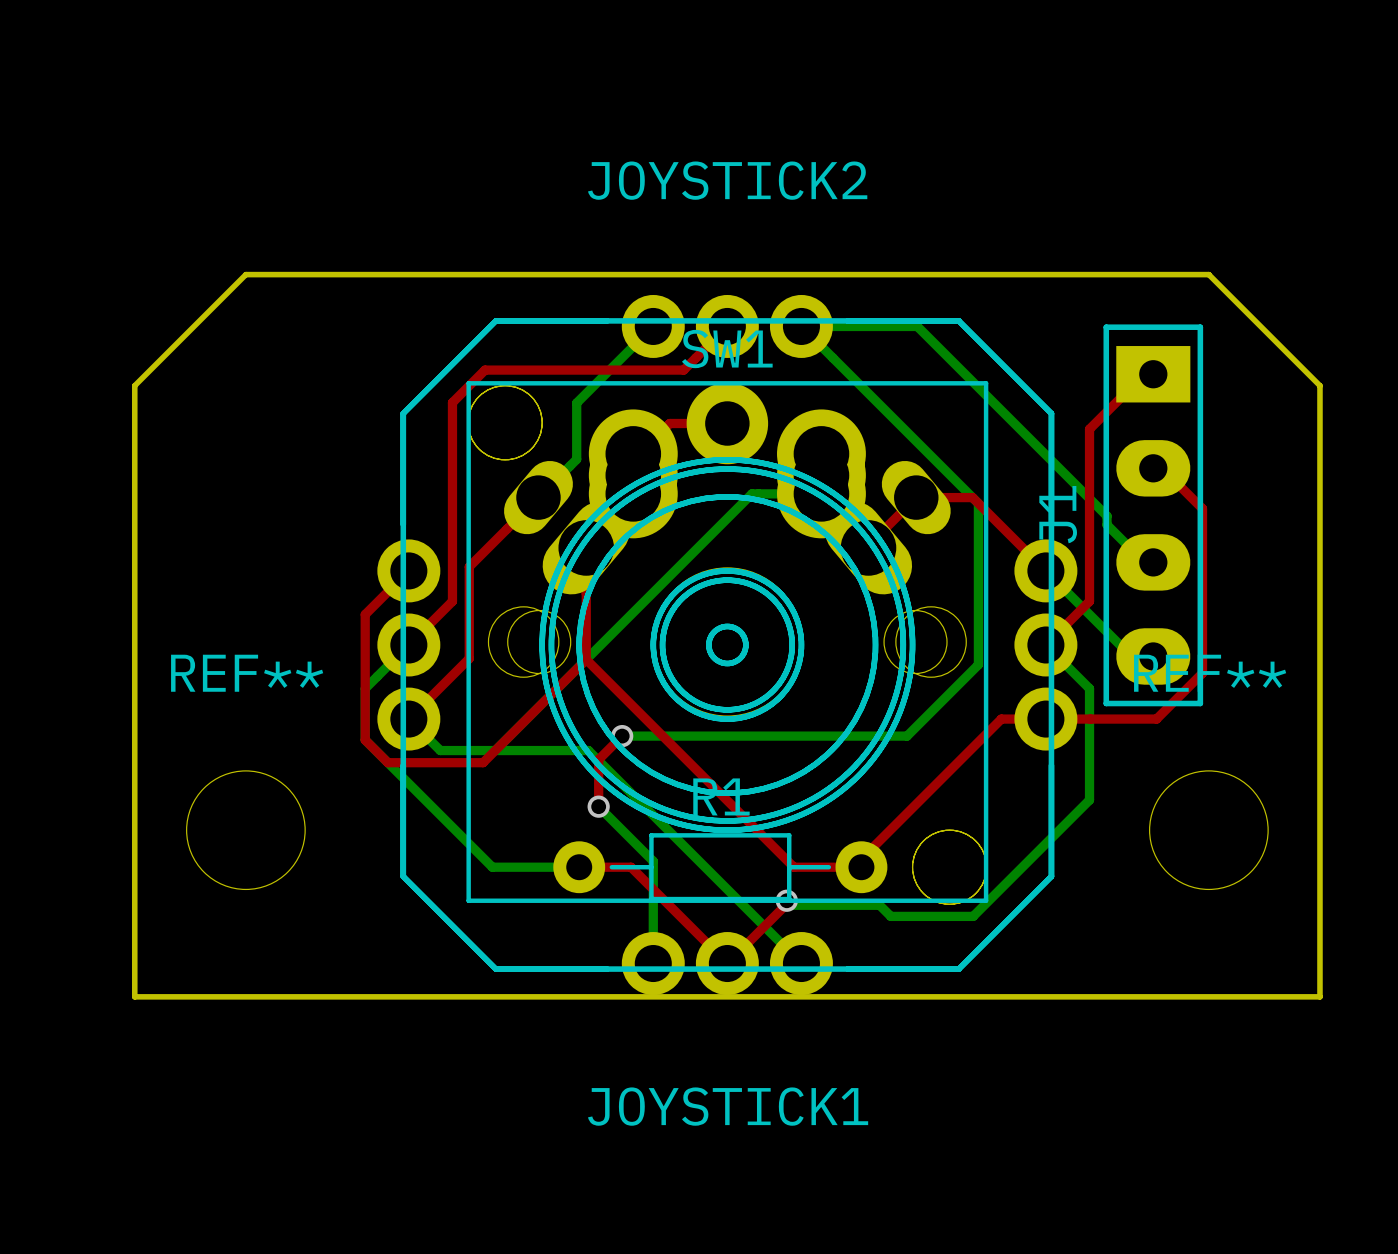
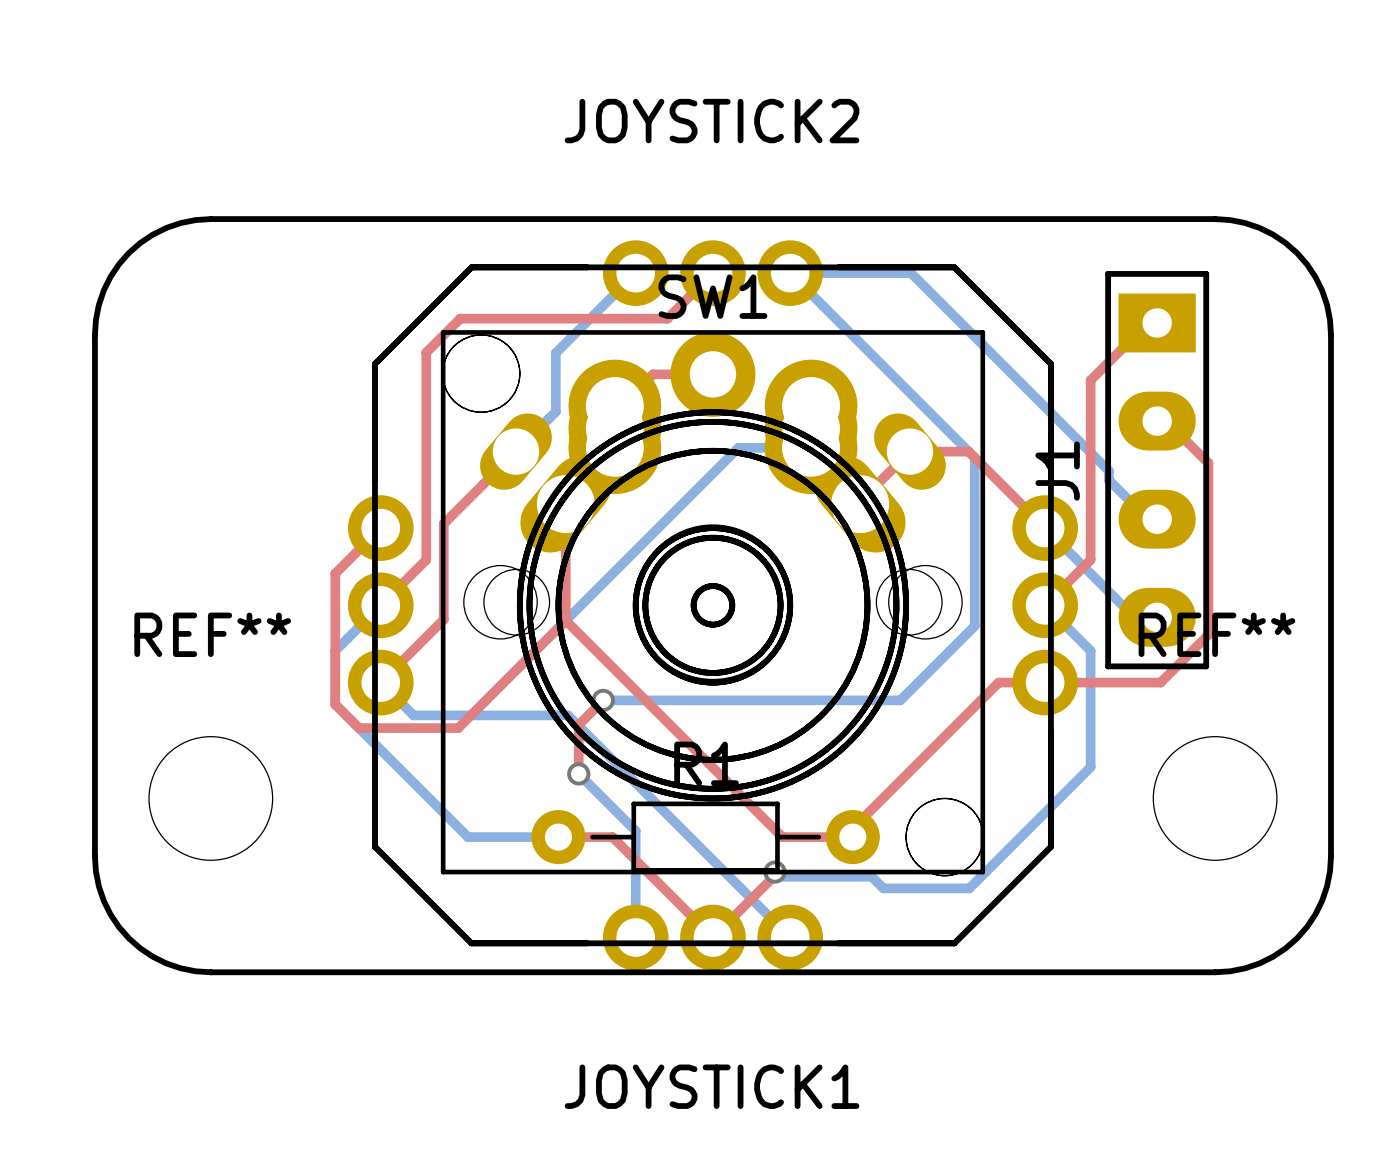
board edge: (245, 274) (134, 385) -> (210, 219) (180, 223) (166, 227) (140, 243) (128, 253) (118, 264) (103, 290) (98, 304) (94, 334)
board edge: (1208, 274) (1319, 385) -> (1215, 219) (1245, 223) (1259, 227) (1285, 243) (1297, 253) (1307, 264) (1322, 290) (1327, 304) (1330, 334)
board edge: (134, 885) (134, 996) (245, 996) -> (94, 856) (98, 886) (103, 900) (110, 914) (128, 938) (140, 948) (166, 963) (180, 968) (210, 972)
board edge: (1319, 885) (1319, 996) (1208, 996) -> (1330, 856) (1327, 886) (1322, 900) (1307, 926) (1297, 938) (1285, 948) (1259, 963) (1245, 968) (1215, 972)

